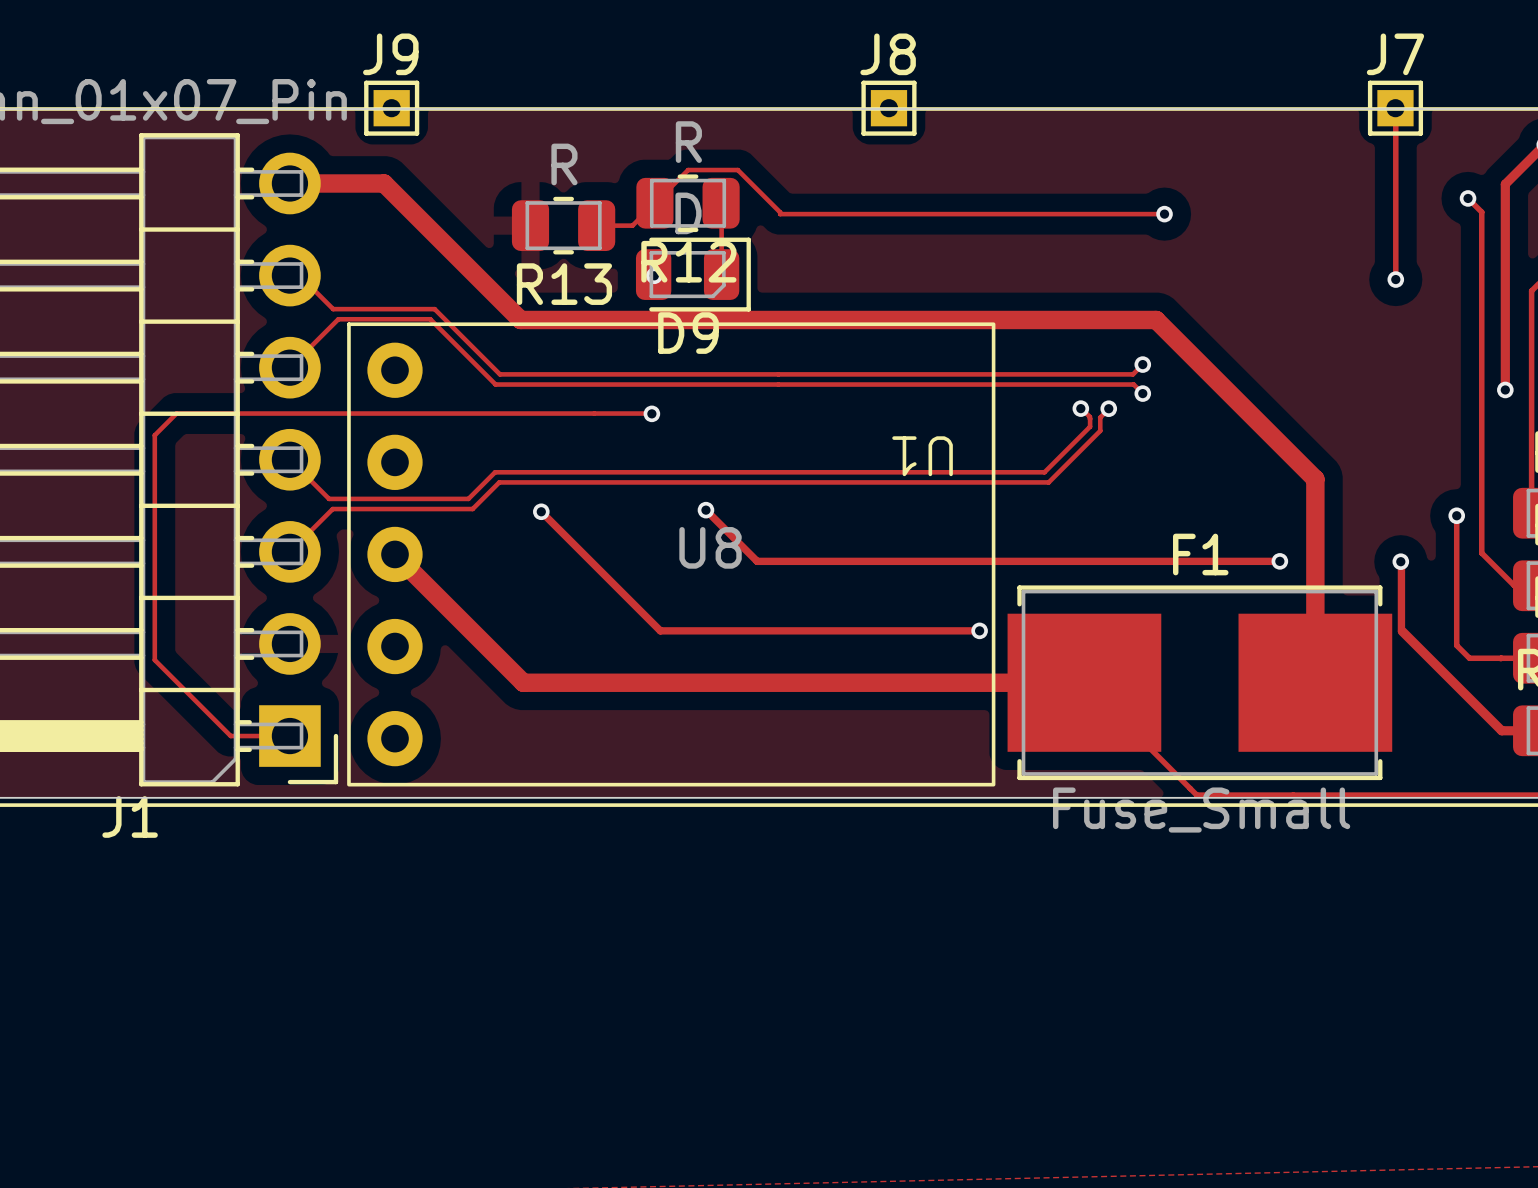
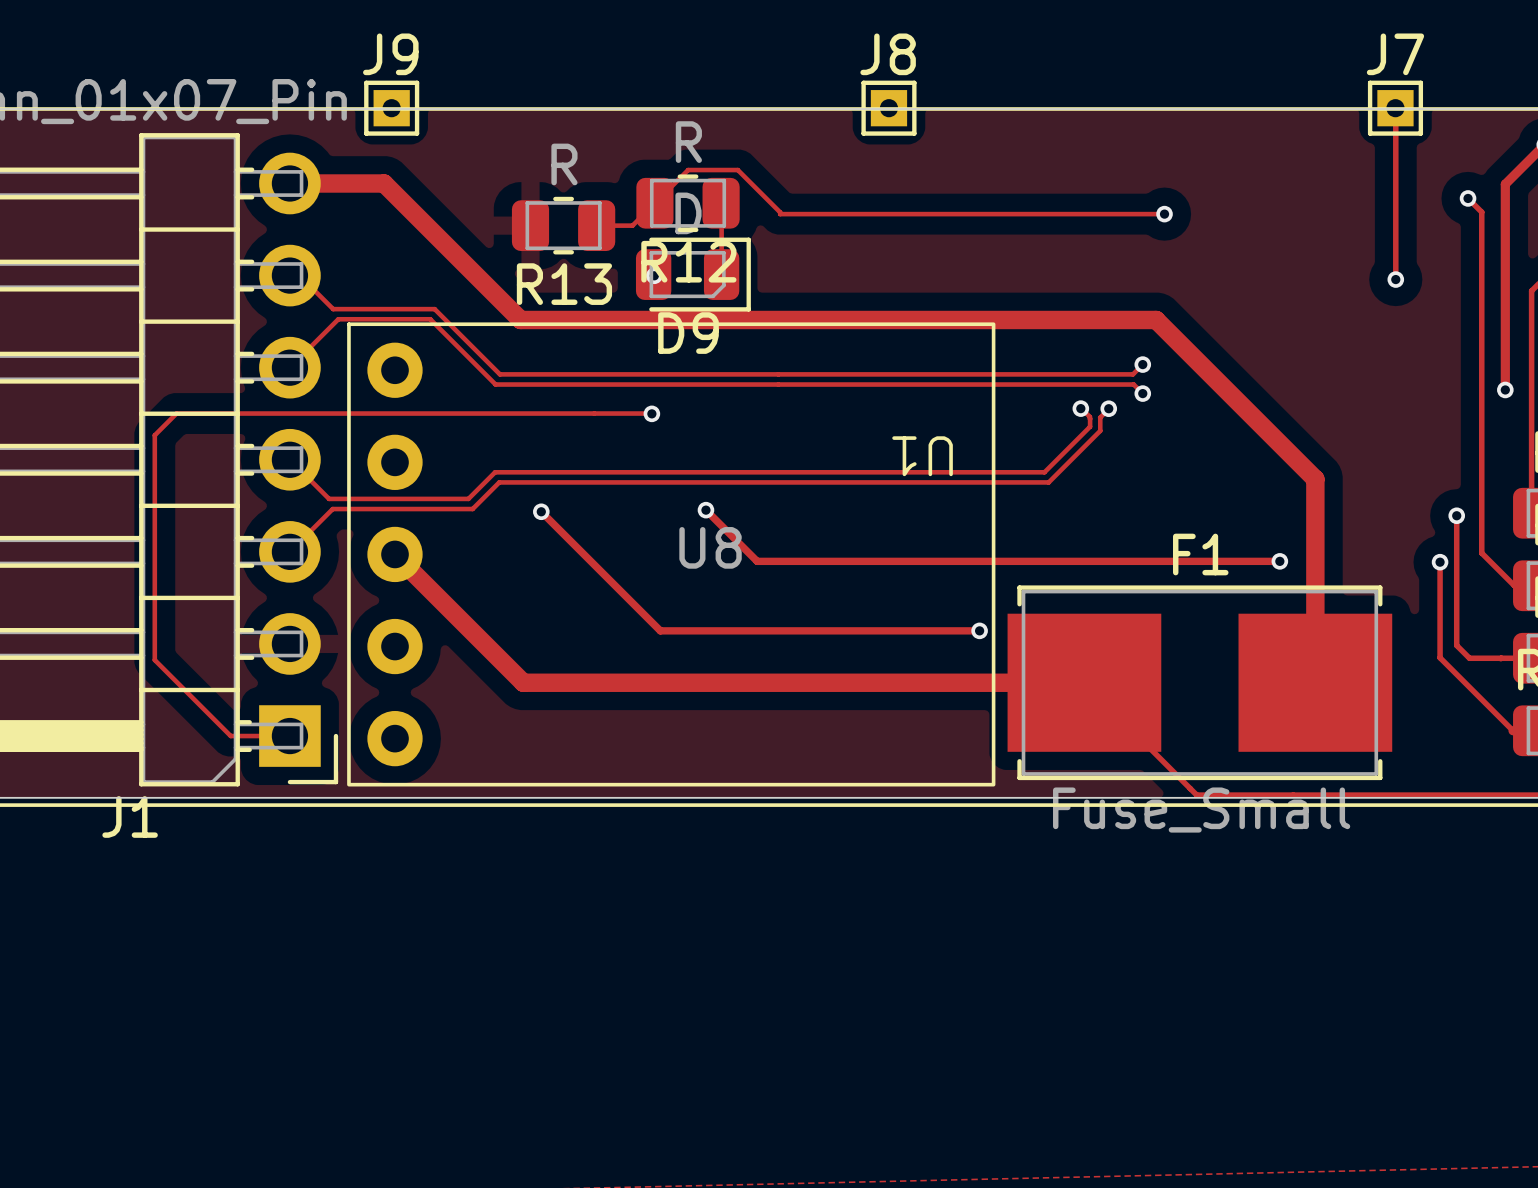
via position: (1400, 561) -> (1440, 562)
track: (1401, 562) (1401, 631) -> none
track: (1402, 631) (1501, 730) (1513, 730) -> (1440, 562) (1440, 657) (1513, 730)

